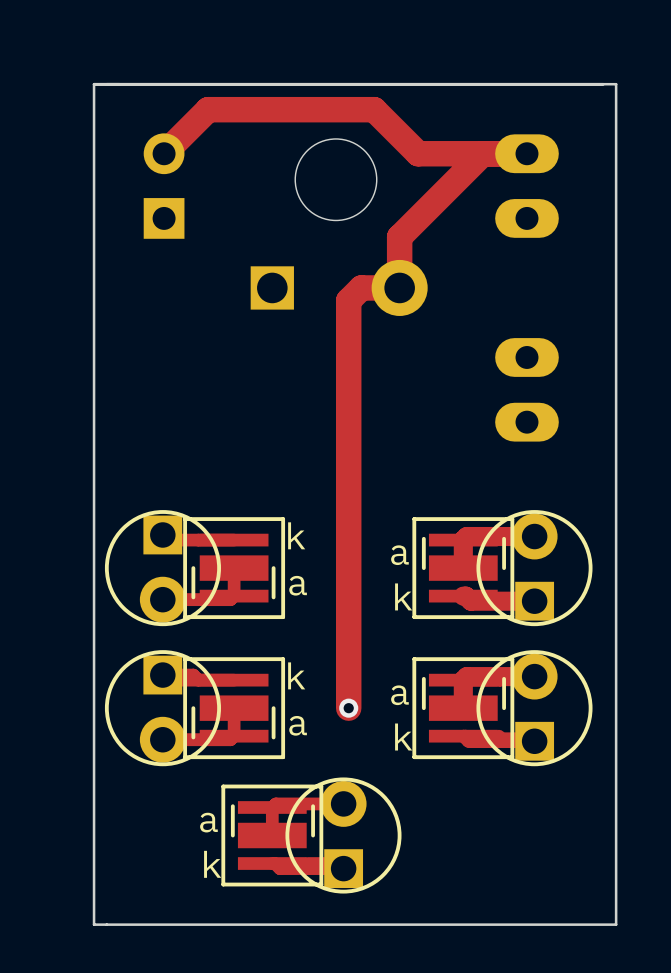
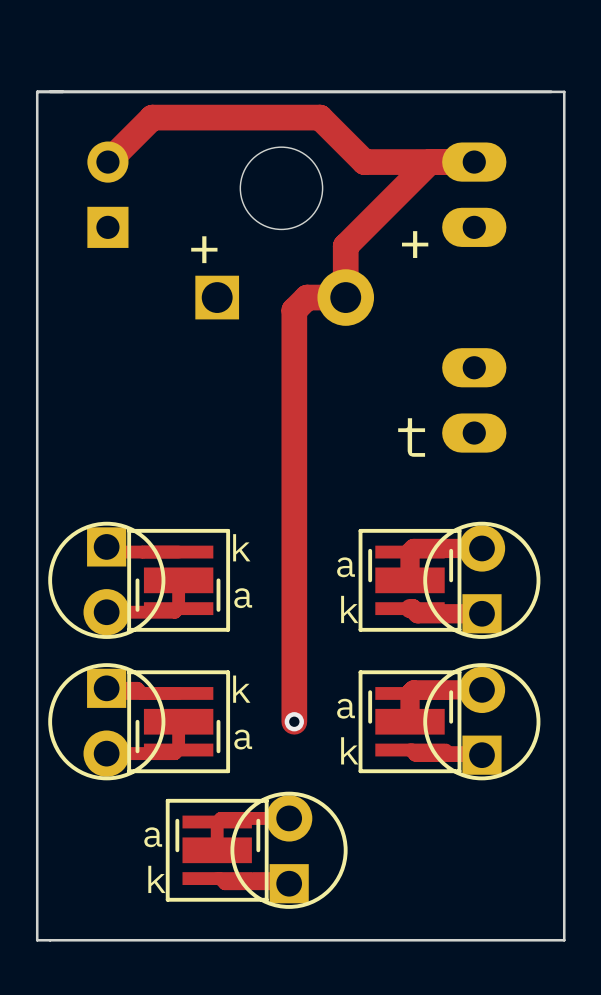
text: none -> + (415, 244)
text: none -> + (204, 249)
text: none -> t (411, 437)

